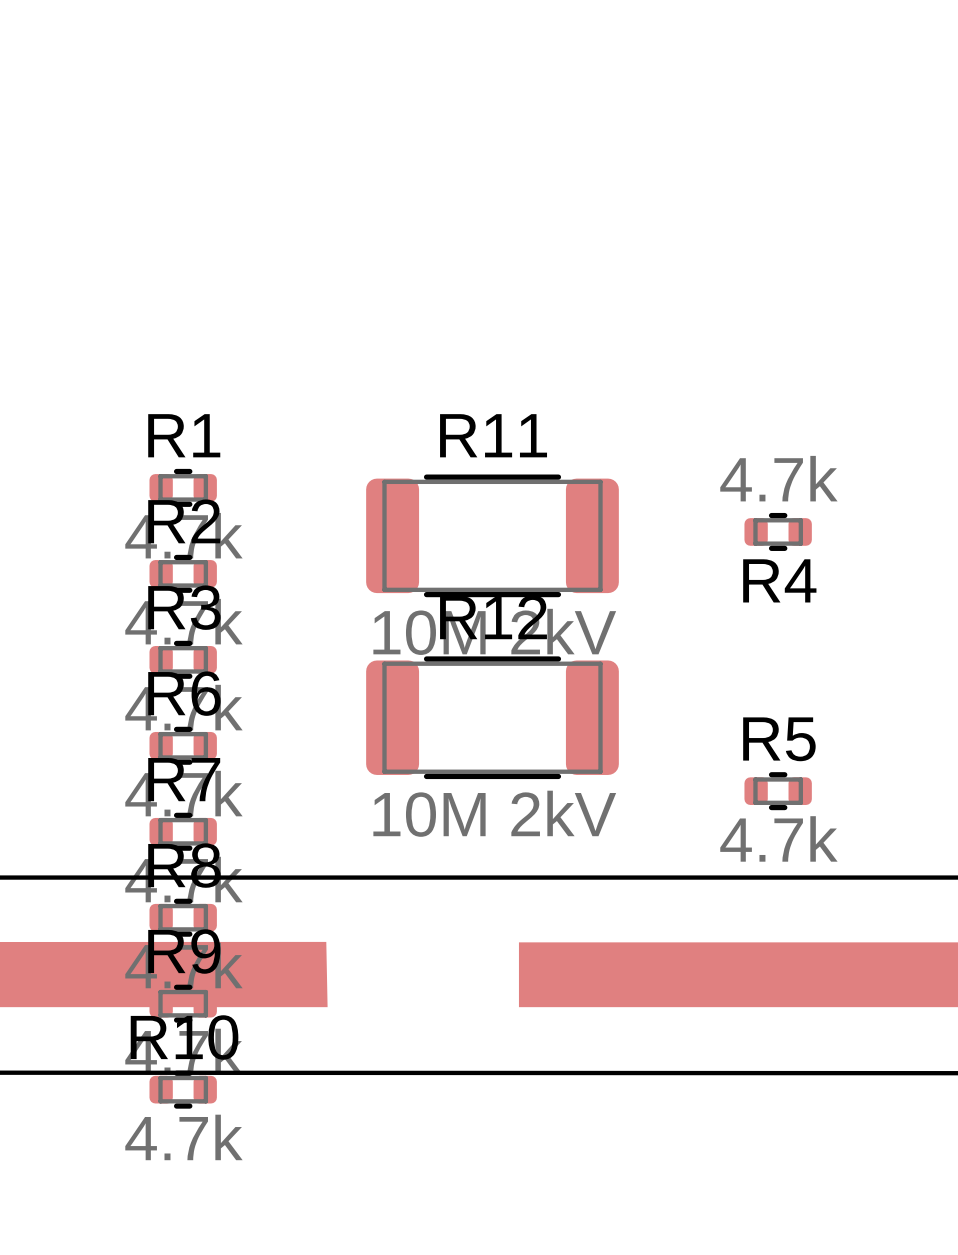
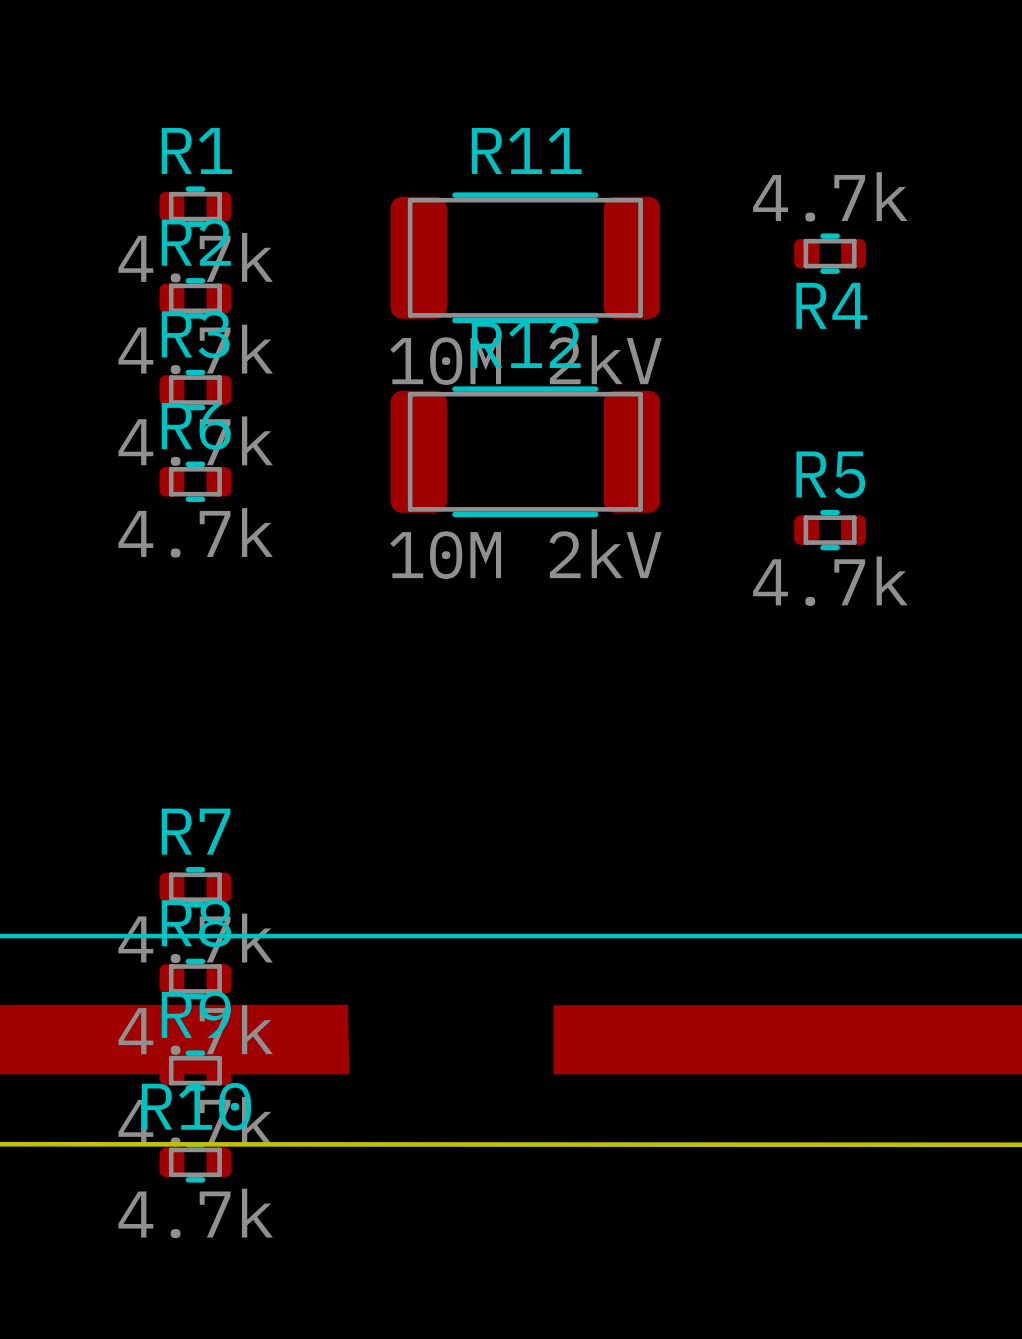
R1 position: (183, 487) -> (195, 206)
R4 position: (778, 531) -> (830, 253)
R11 position: (492, 535) -> (525, 257)
R2 position: (183, 573) -> (195, 298)
R3 position: (183, 659) -> (195, 390)
R12 position: (492, 717) -> (525, 451)
R6 position: (183, 745) -> (195, 481)
R5 position: (778, 791) -> (830, 530)

